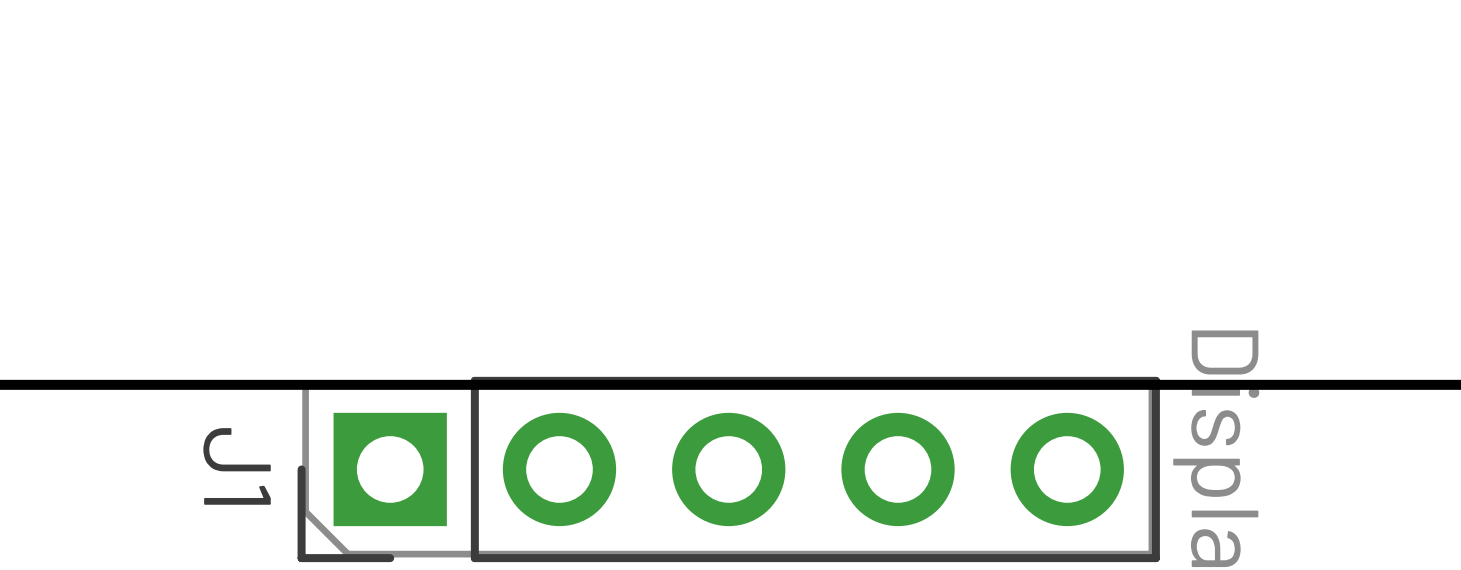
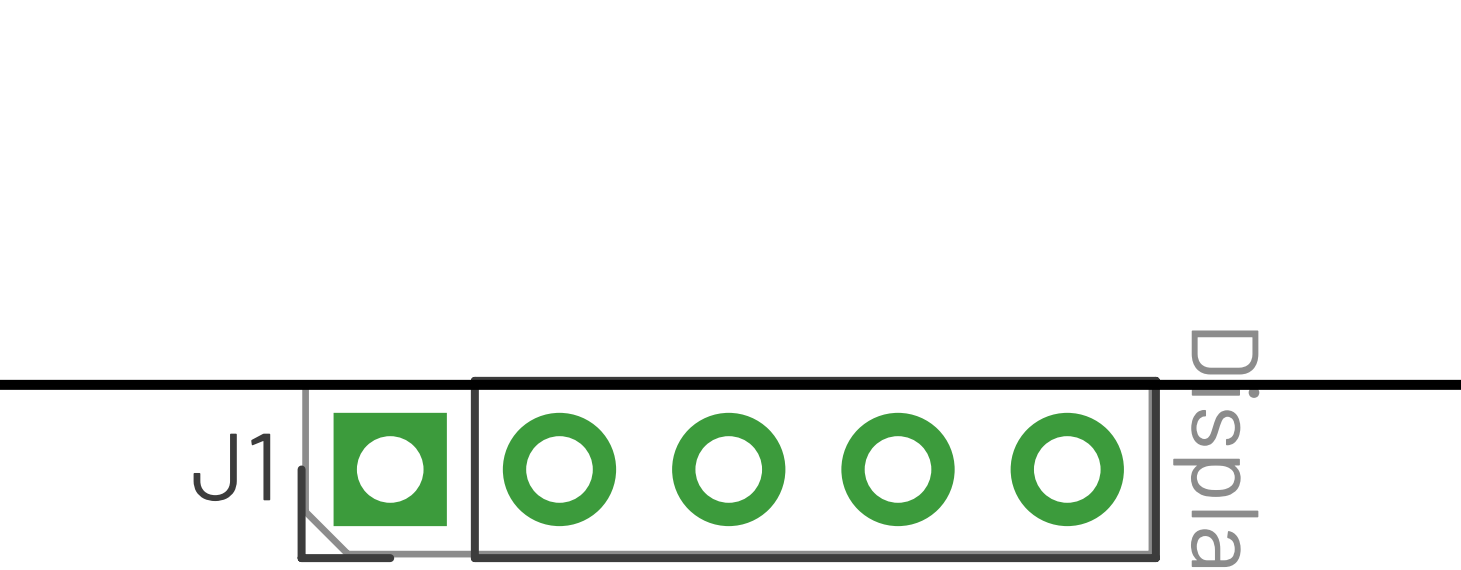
J1 name rotation: 0° (237, 466) -> 90° counterclockwise (231, 467)

